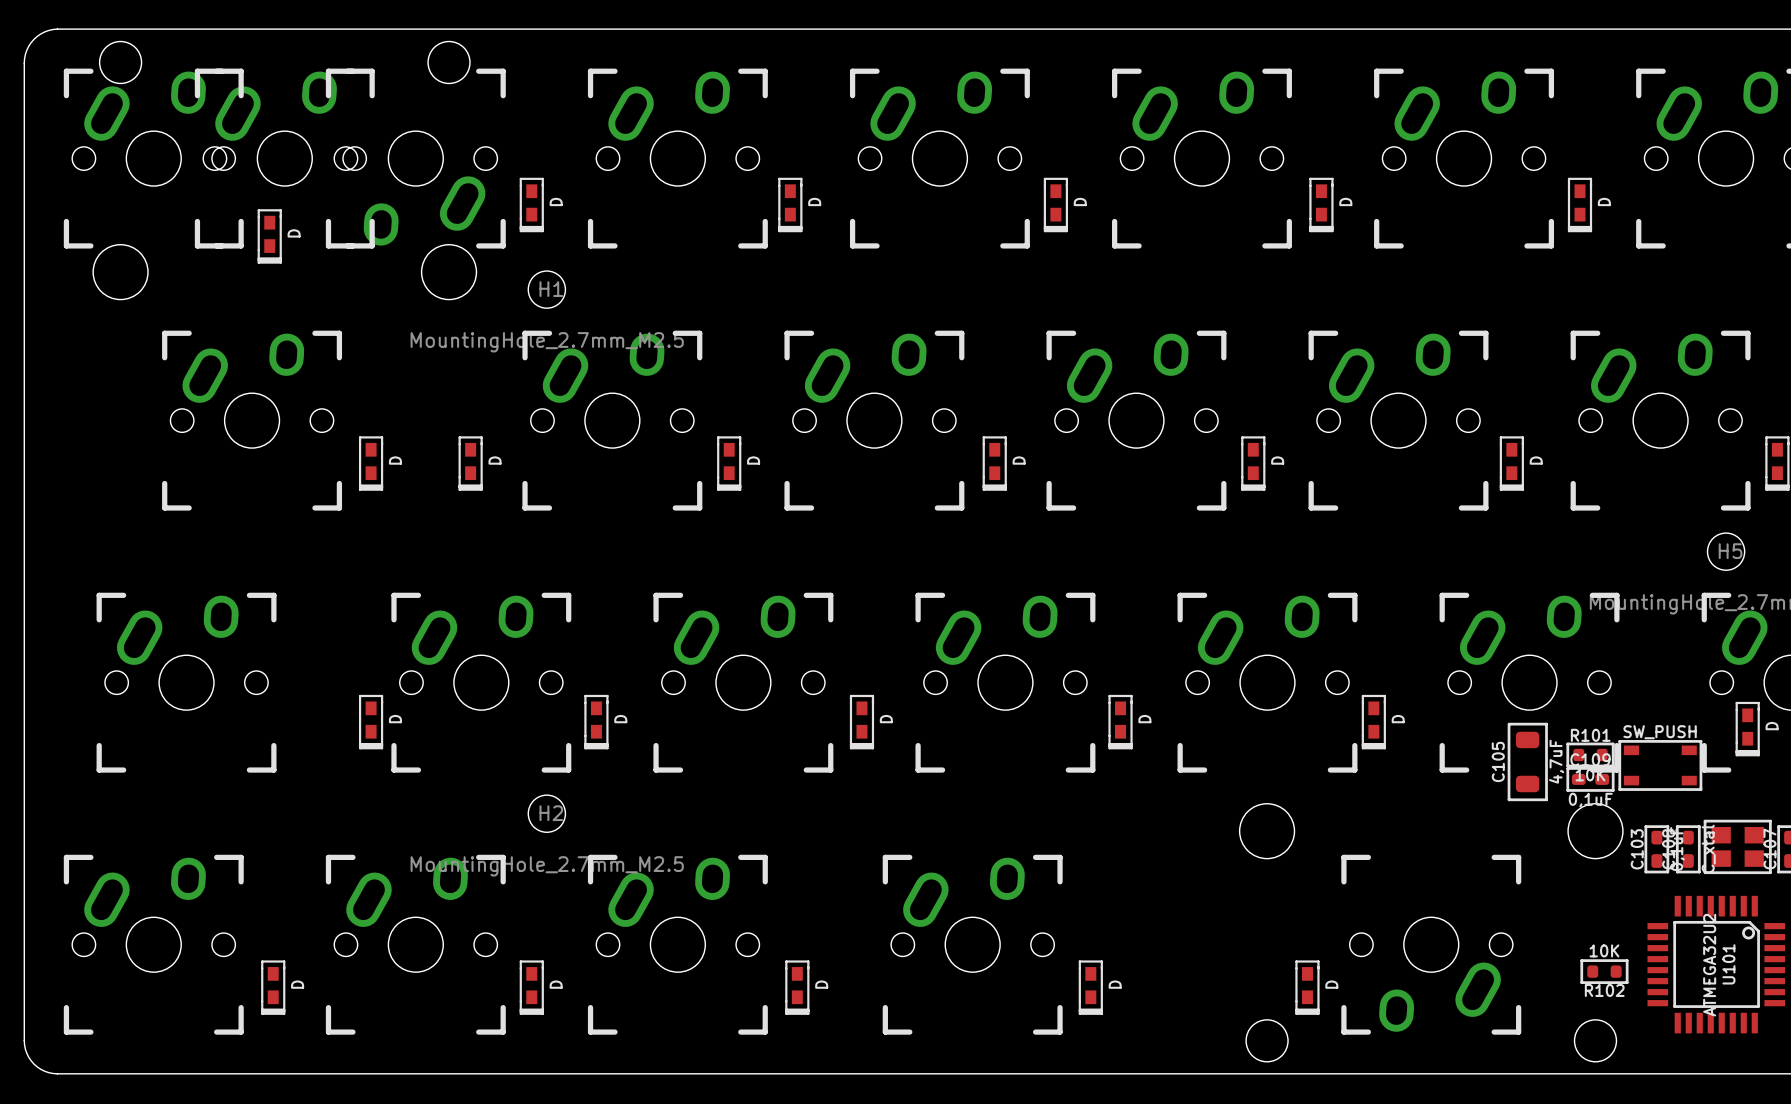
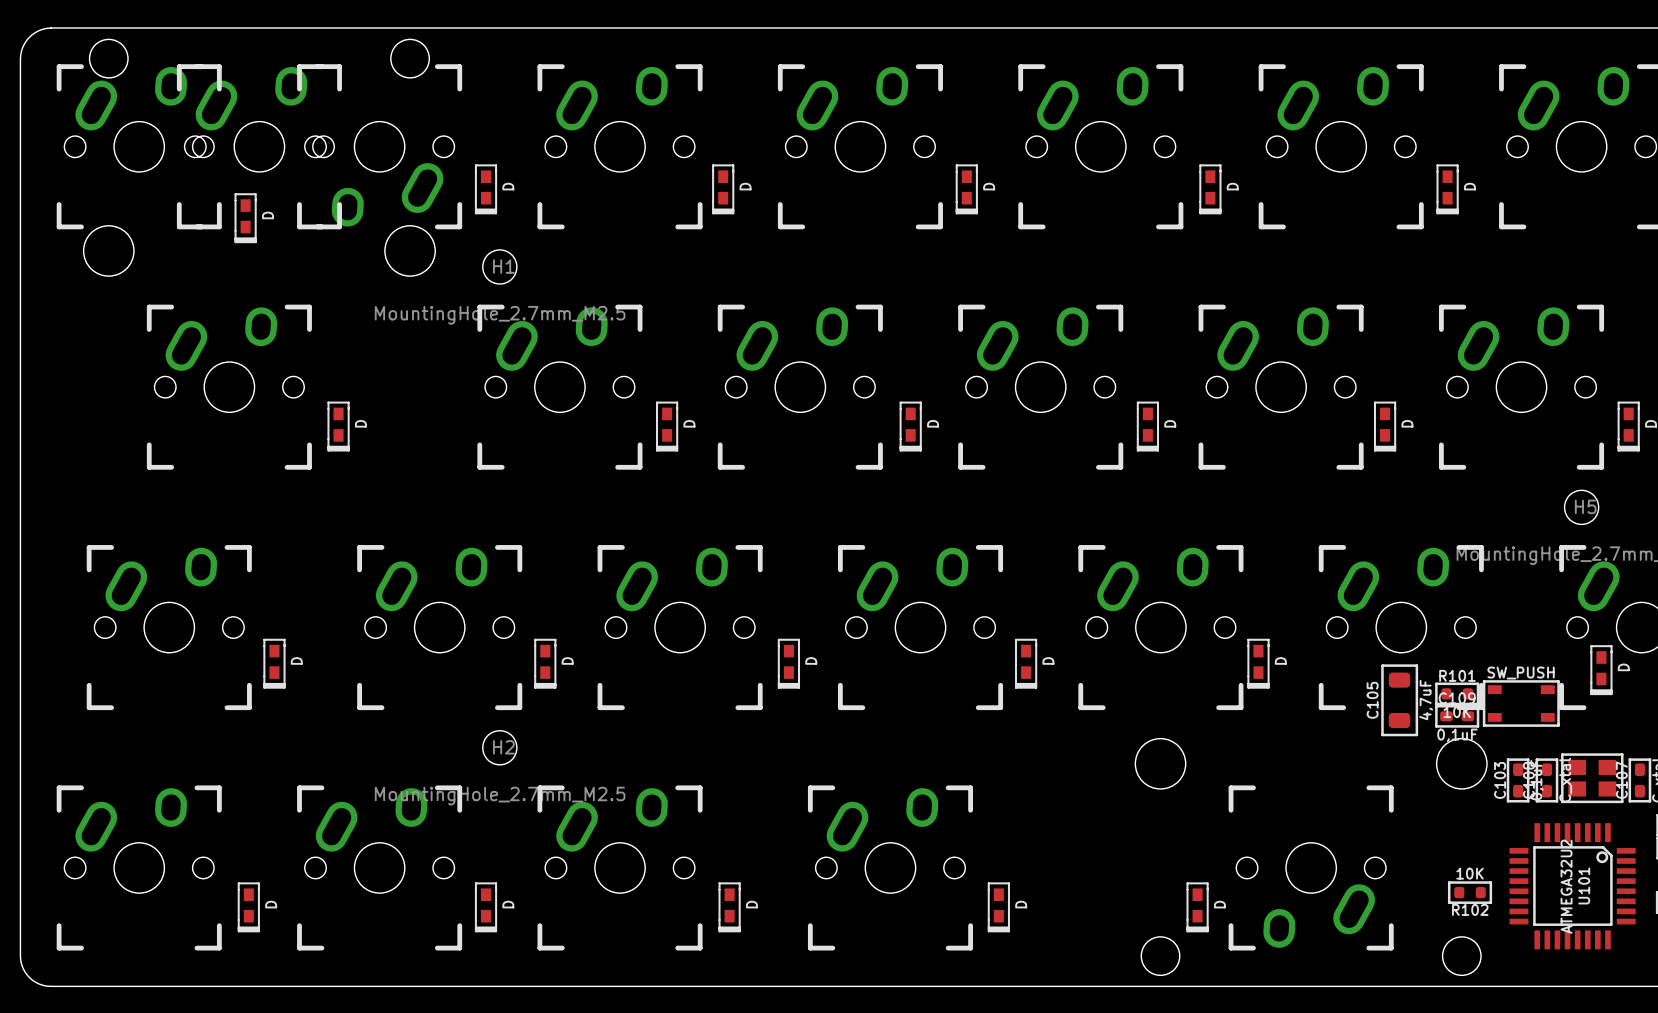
part: D (470, 463) -> none
part position: (371, 722) -> (274, 663)

